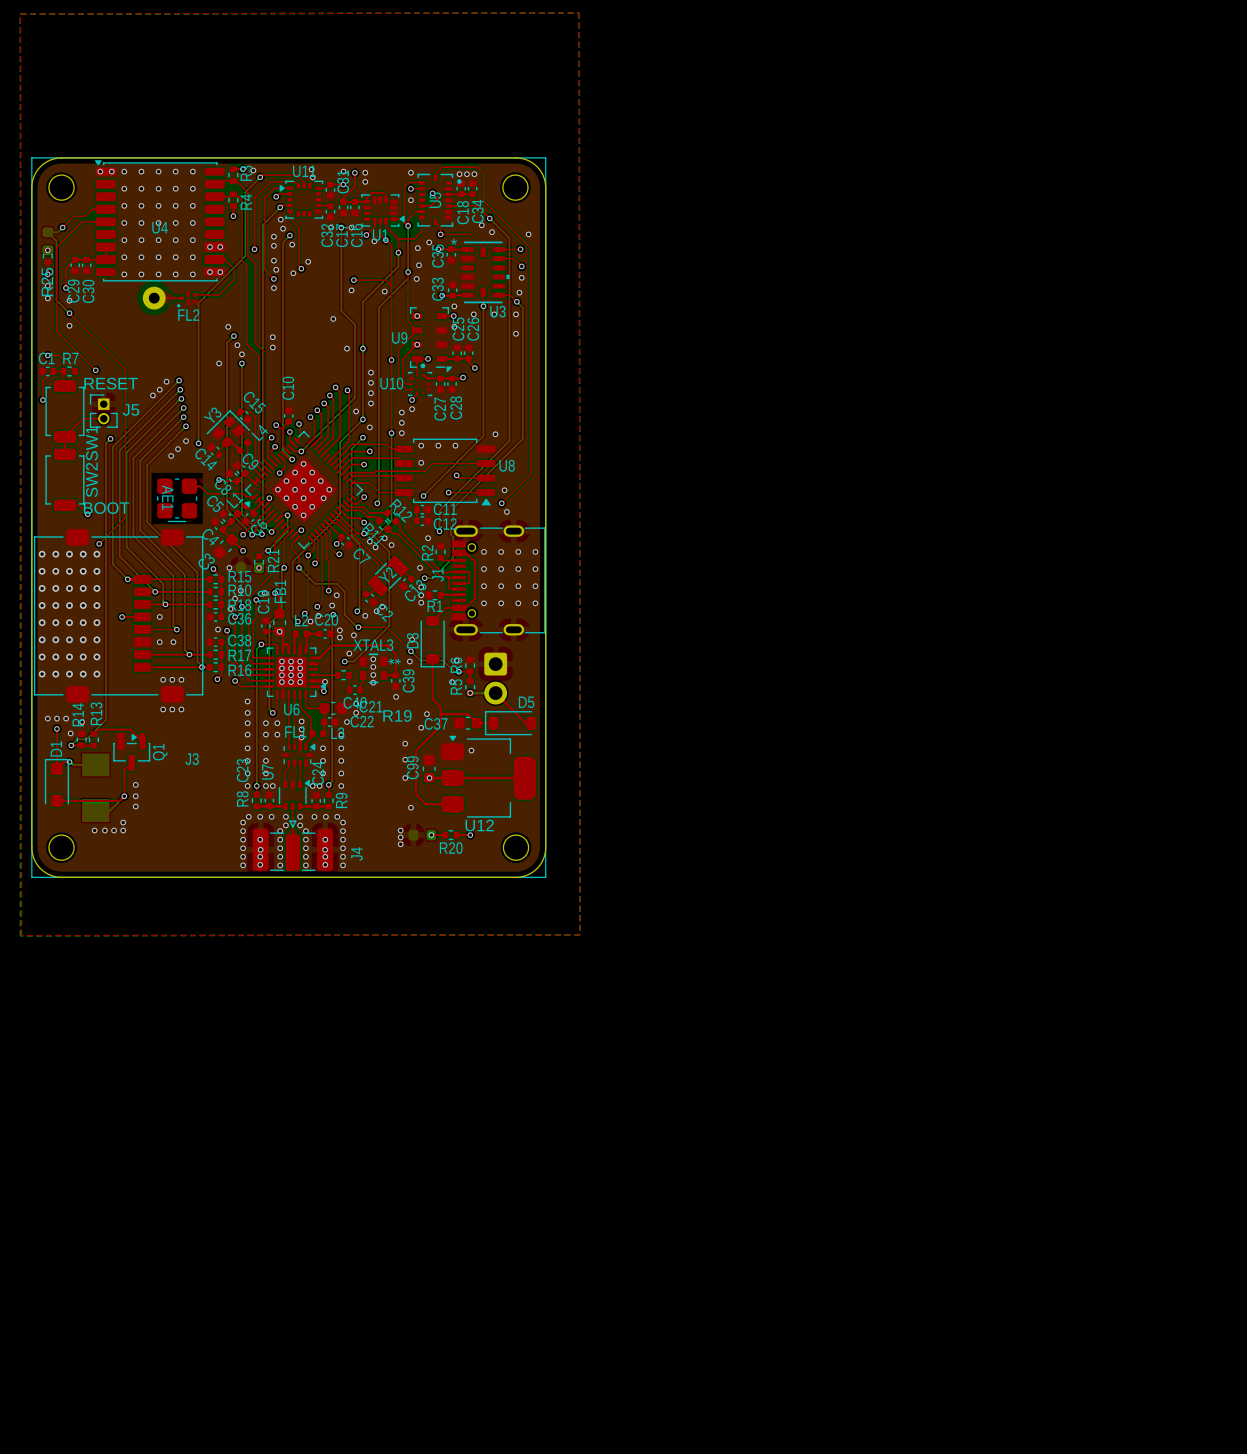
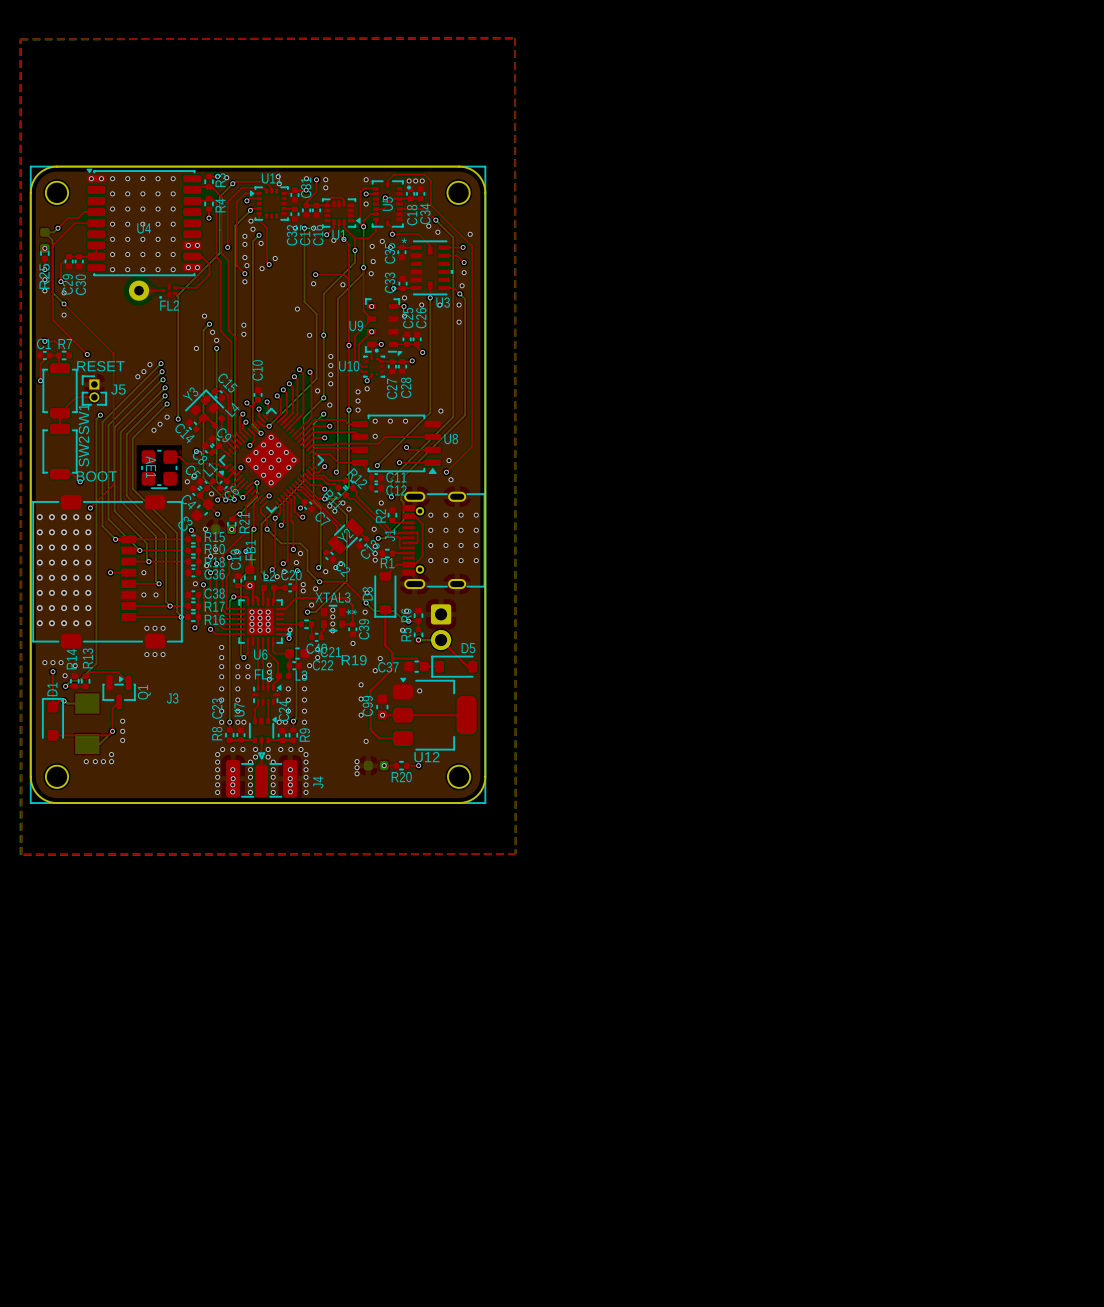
via: none -> (194, 475)
via: none -> (187, 481)
via: none -> (211, 493)

